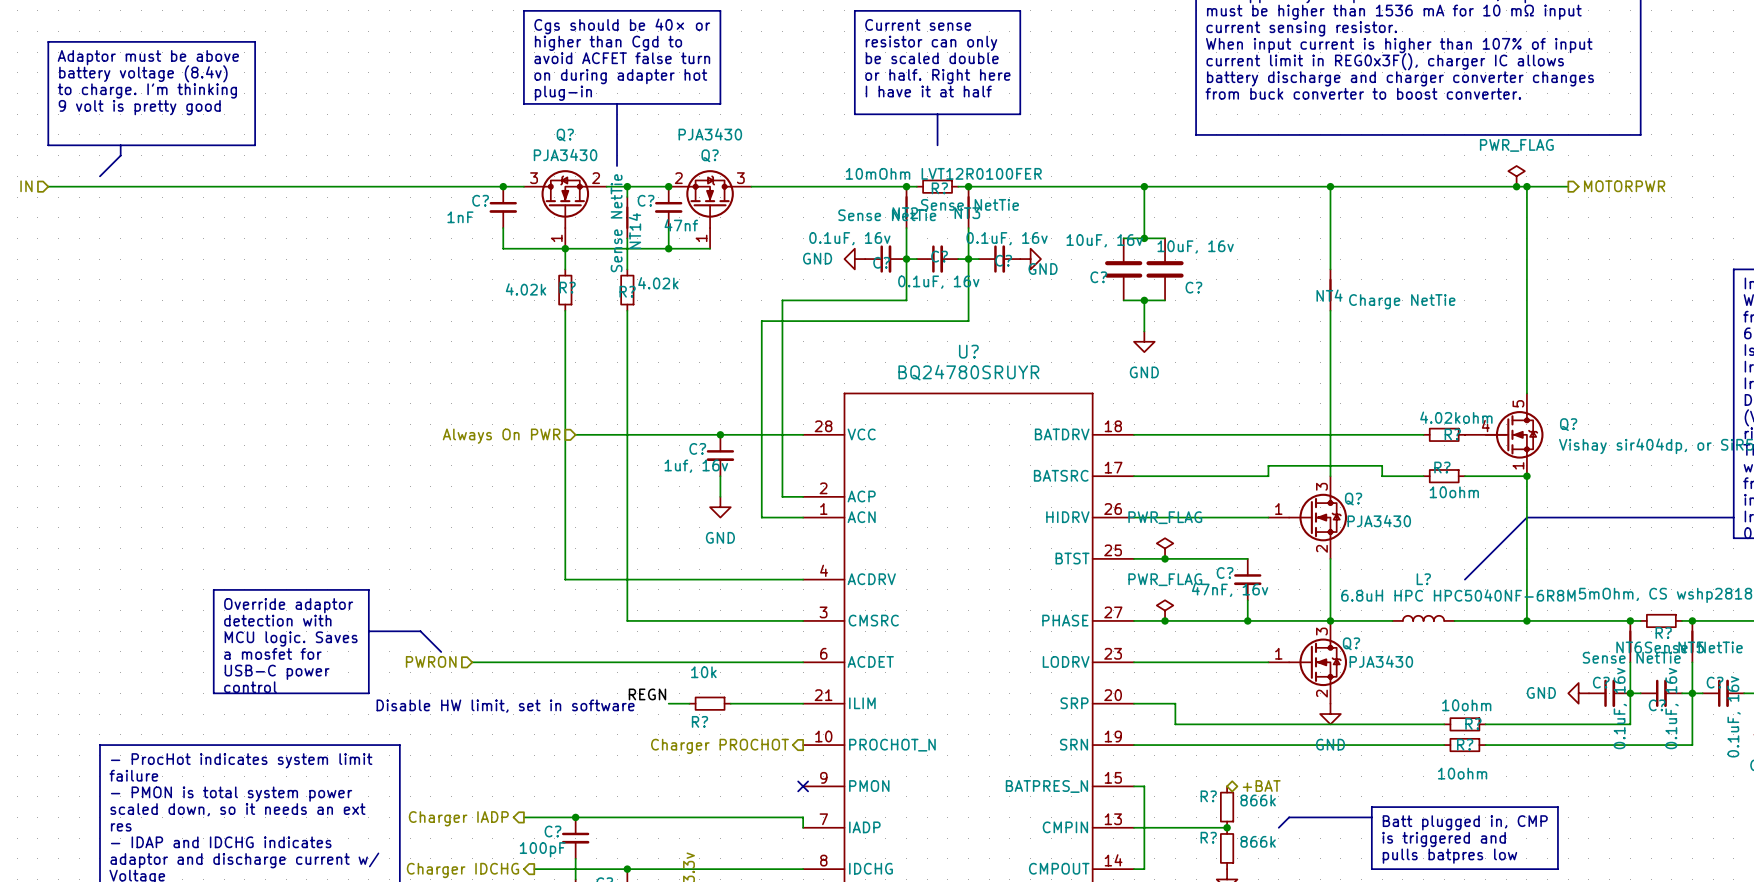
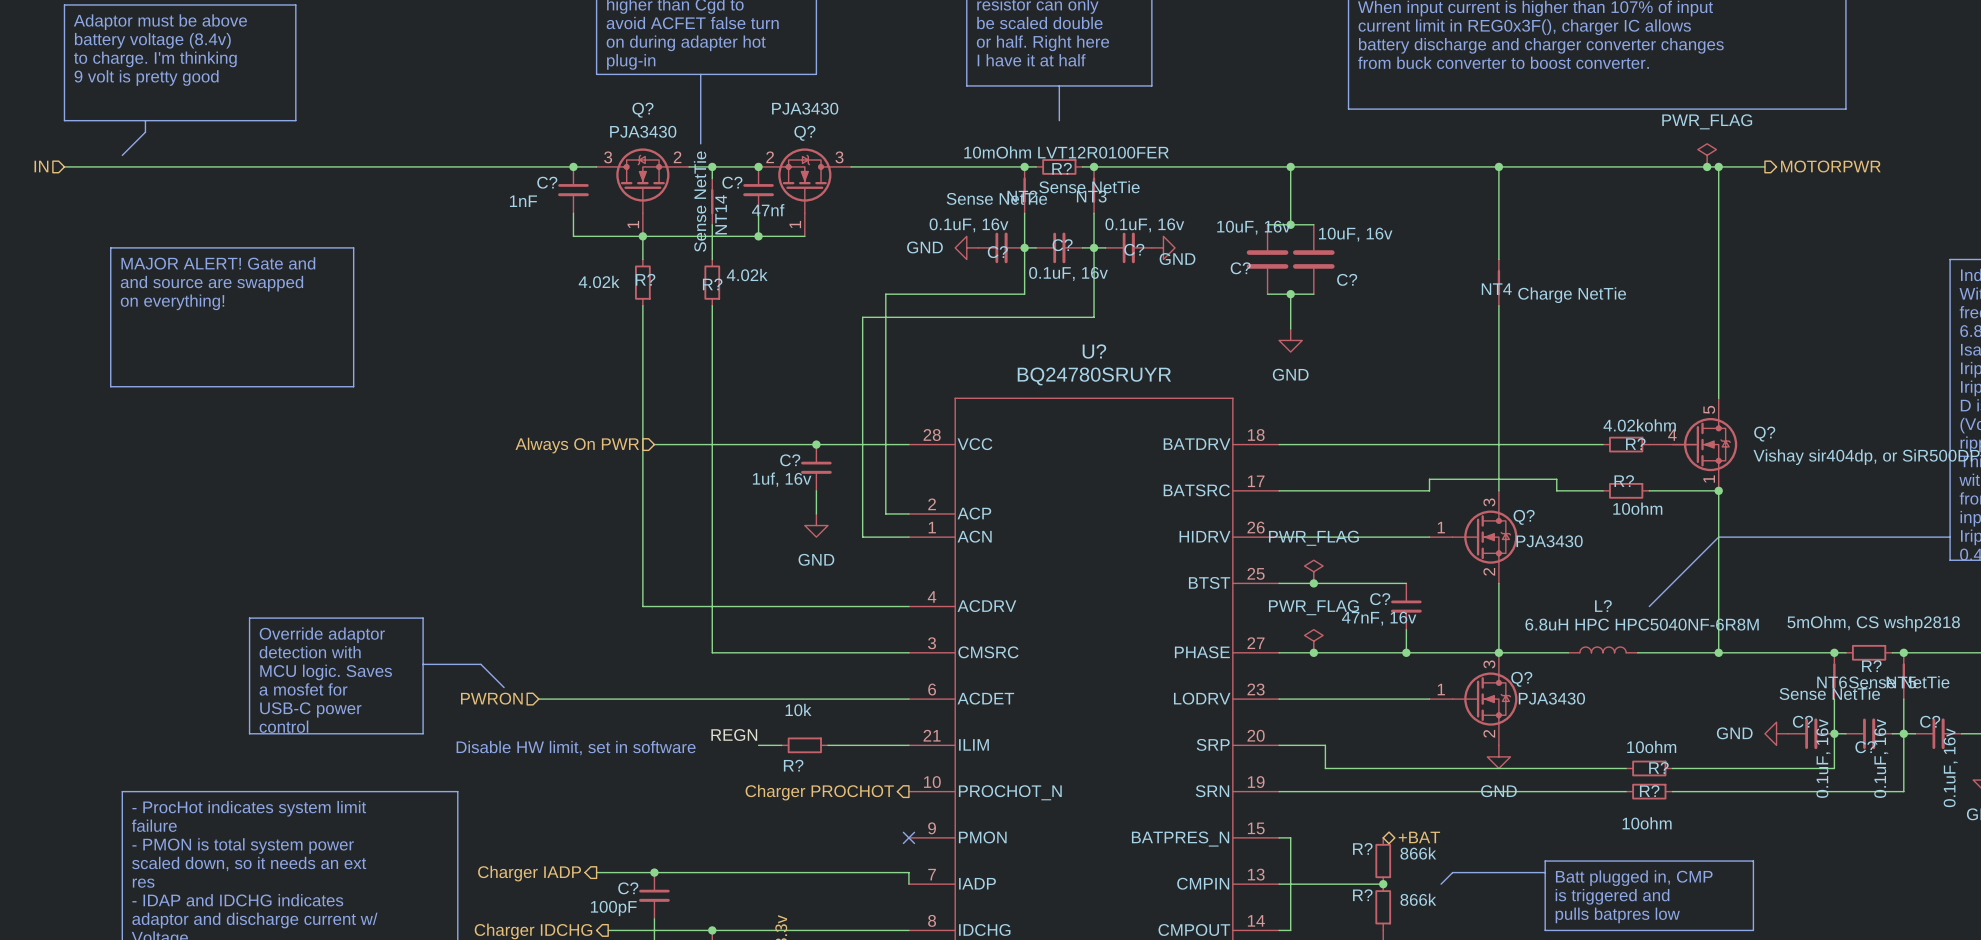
line: none -> (110, 247) (353, 247) (353, 386) (110, 386) (110, 247)
text: none -> MAJOR ALERT! Gate and (218, 263)
text: none -> and source are swapped (212, 283)
text: none -> on everything! (172, 302)

